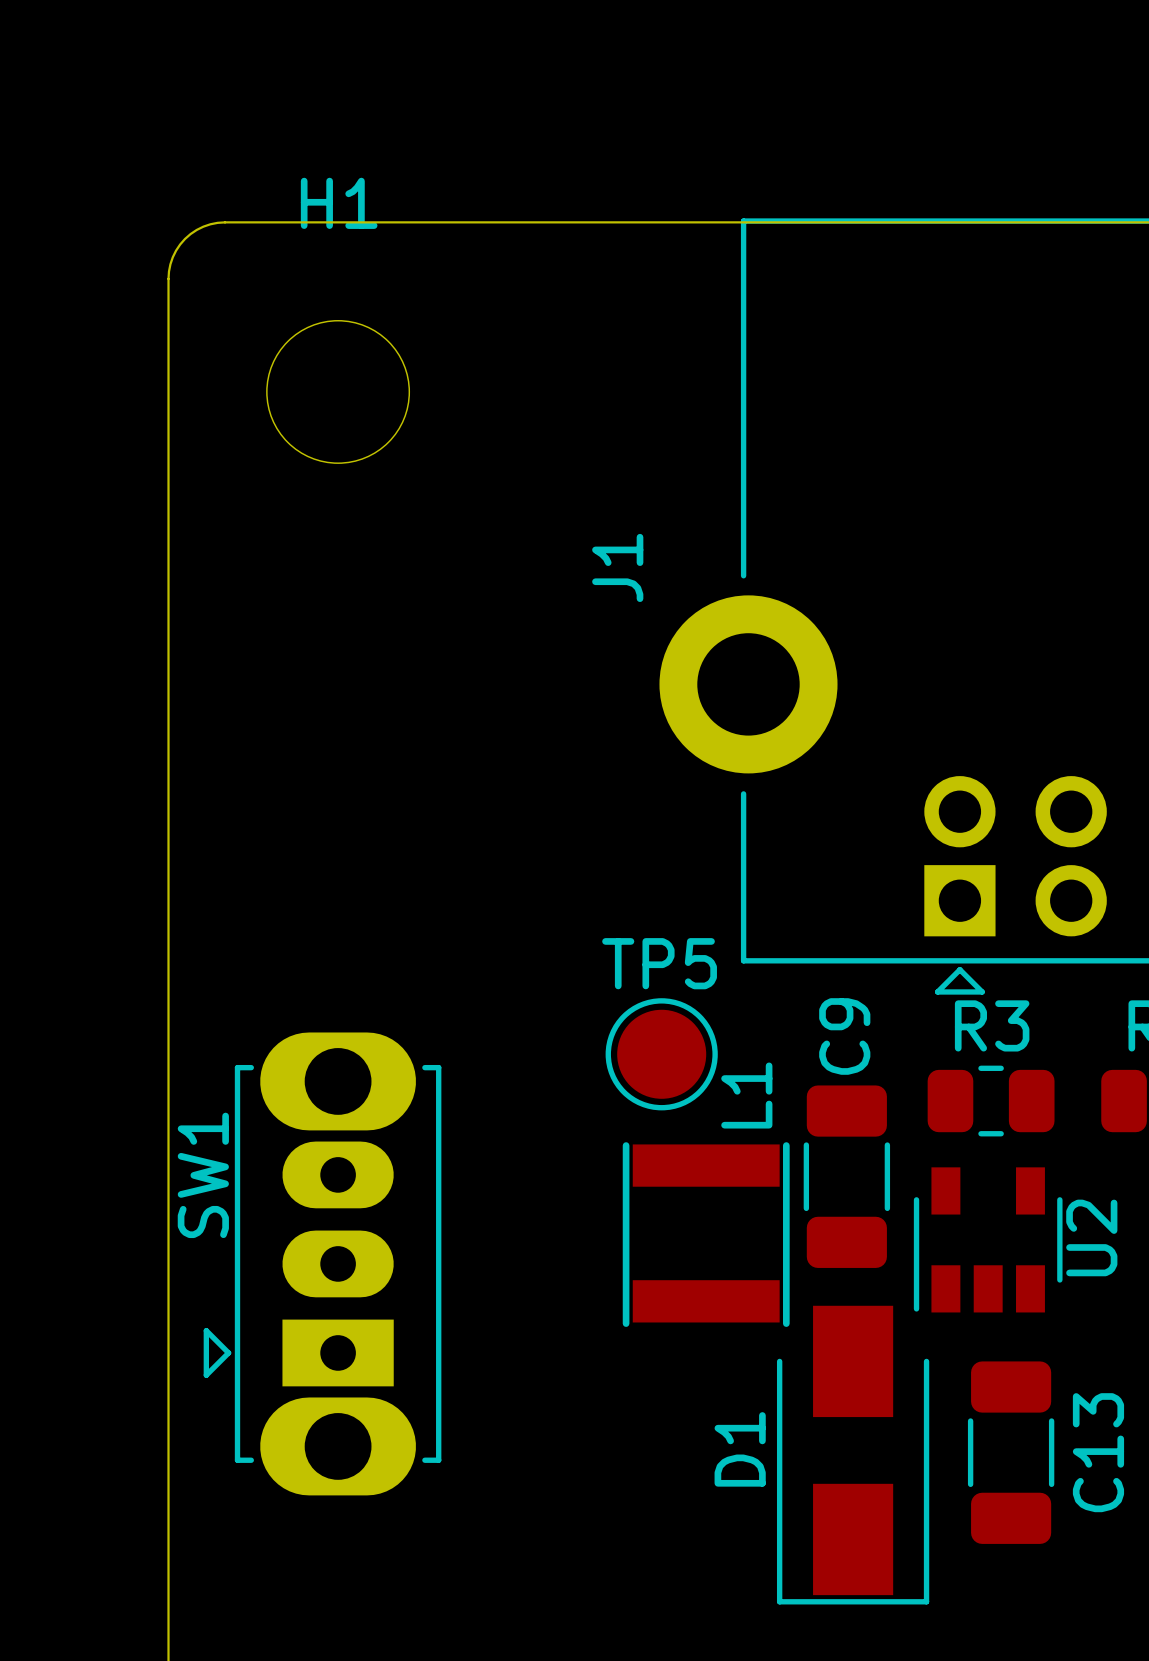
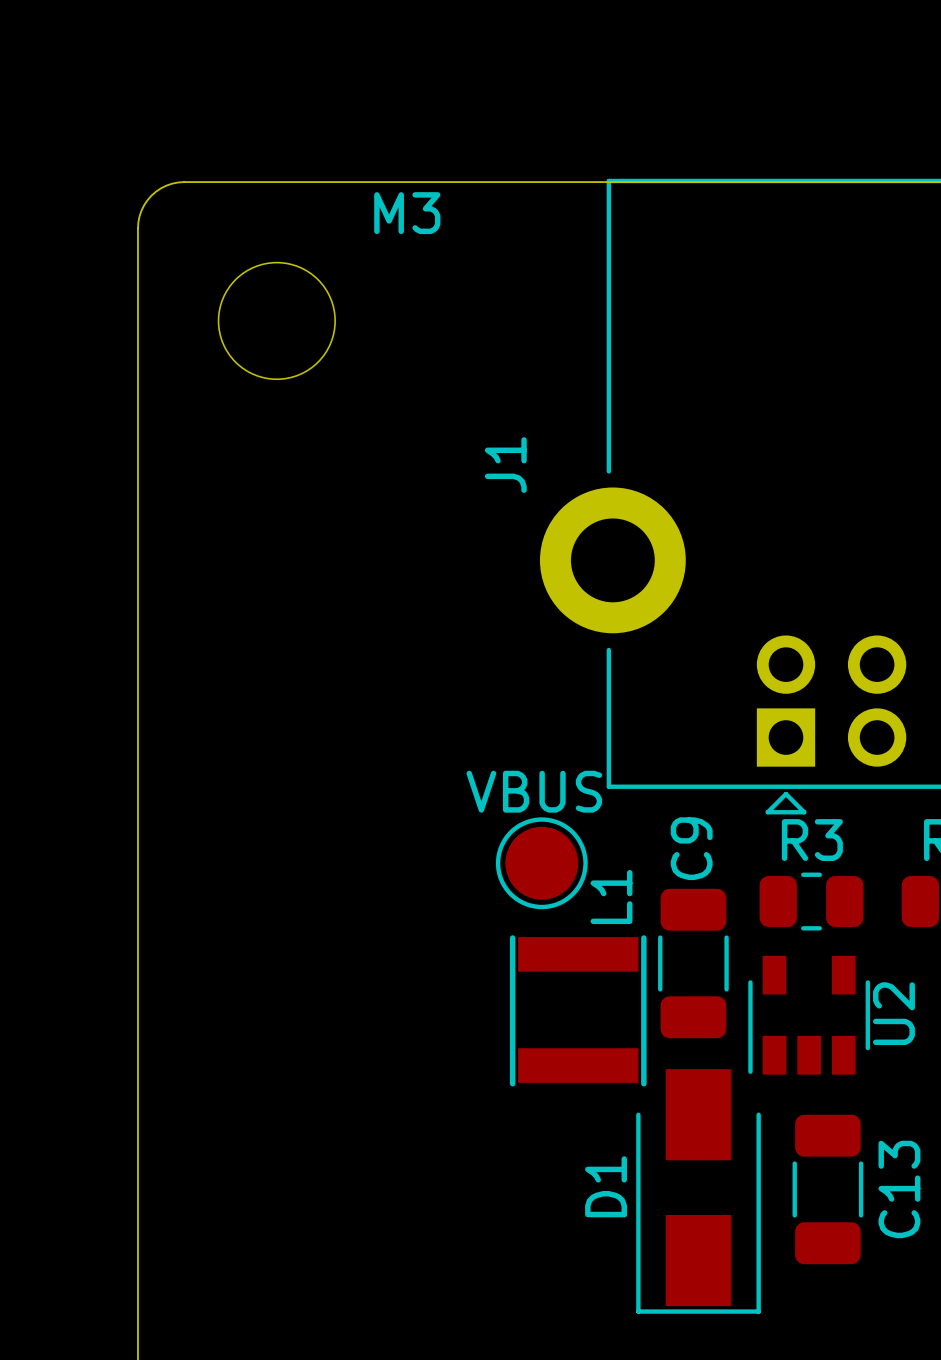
H1 name: H1 (339, 203) -> none
text: none -> M3 (407, 213)
TP5 name: TP5 (659, 963) -> none
text: none -> VBUS (534, 791)
SW1: (322, 1263) -> none

